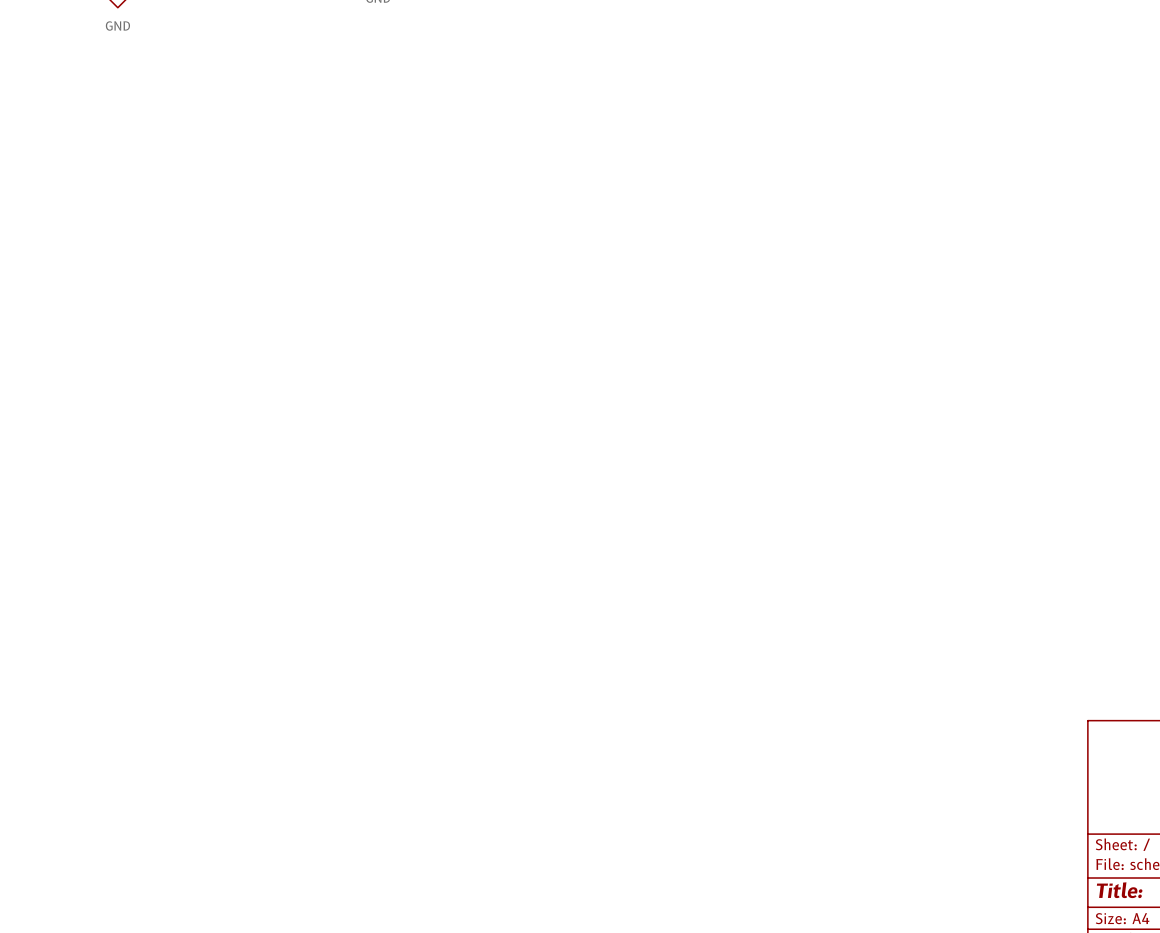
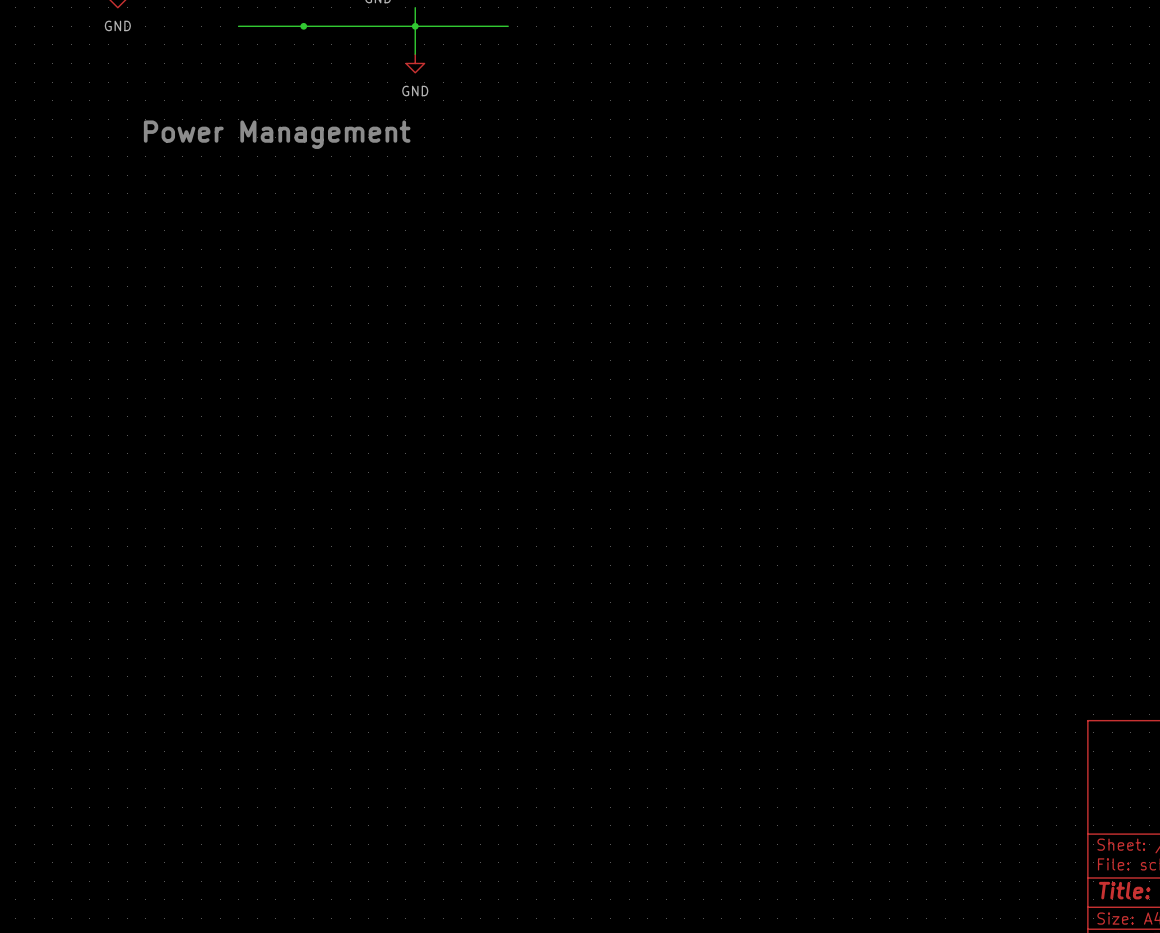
wire: none -> (415, 7) (415, 54)
wire: none -> (238, 26) (508, 26)
junction: none -> (303, 26)
junction: none -> (415, 26)
power symbol: none -> GND (415, 63)
text: none -> Power Management (277, 134)

